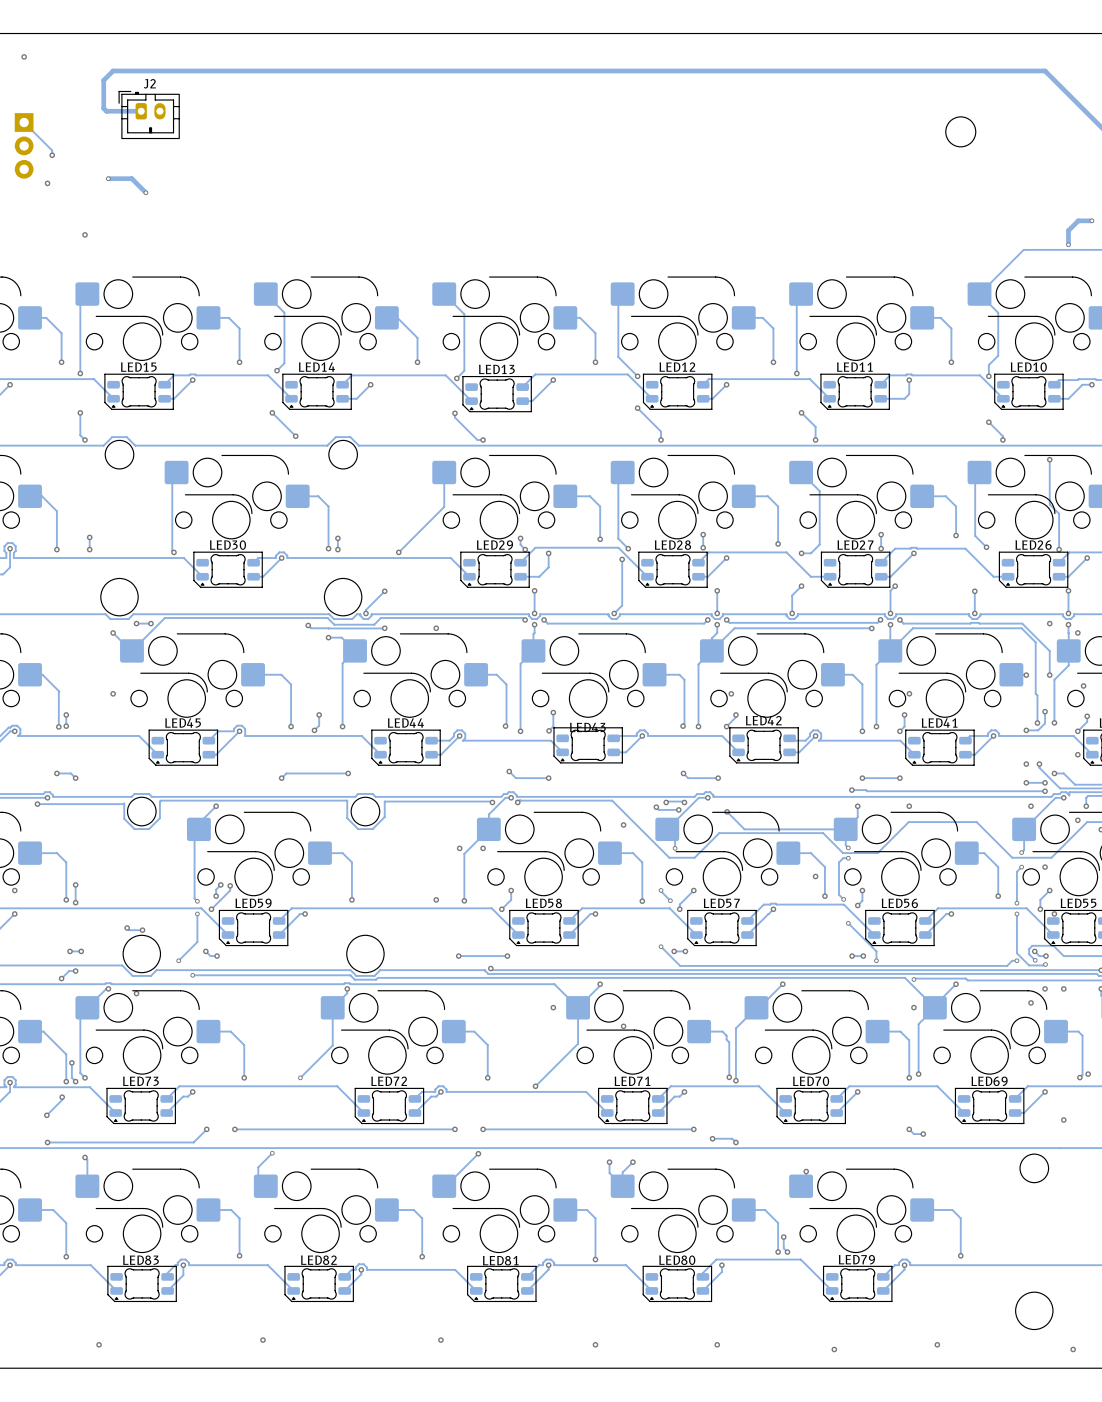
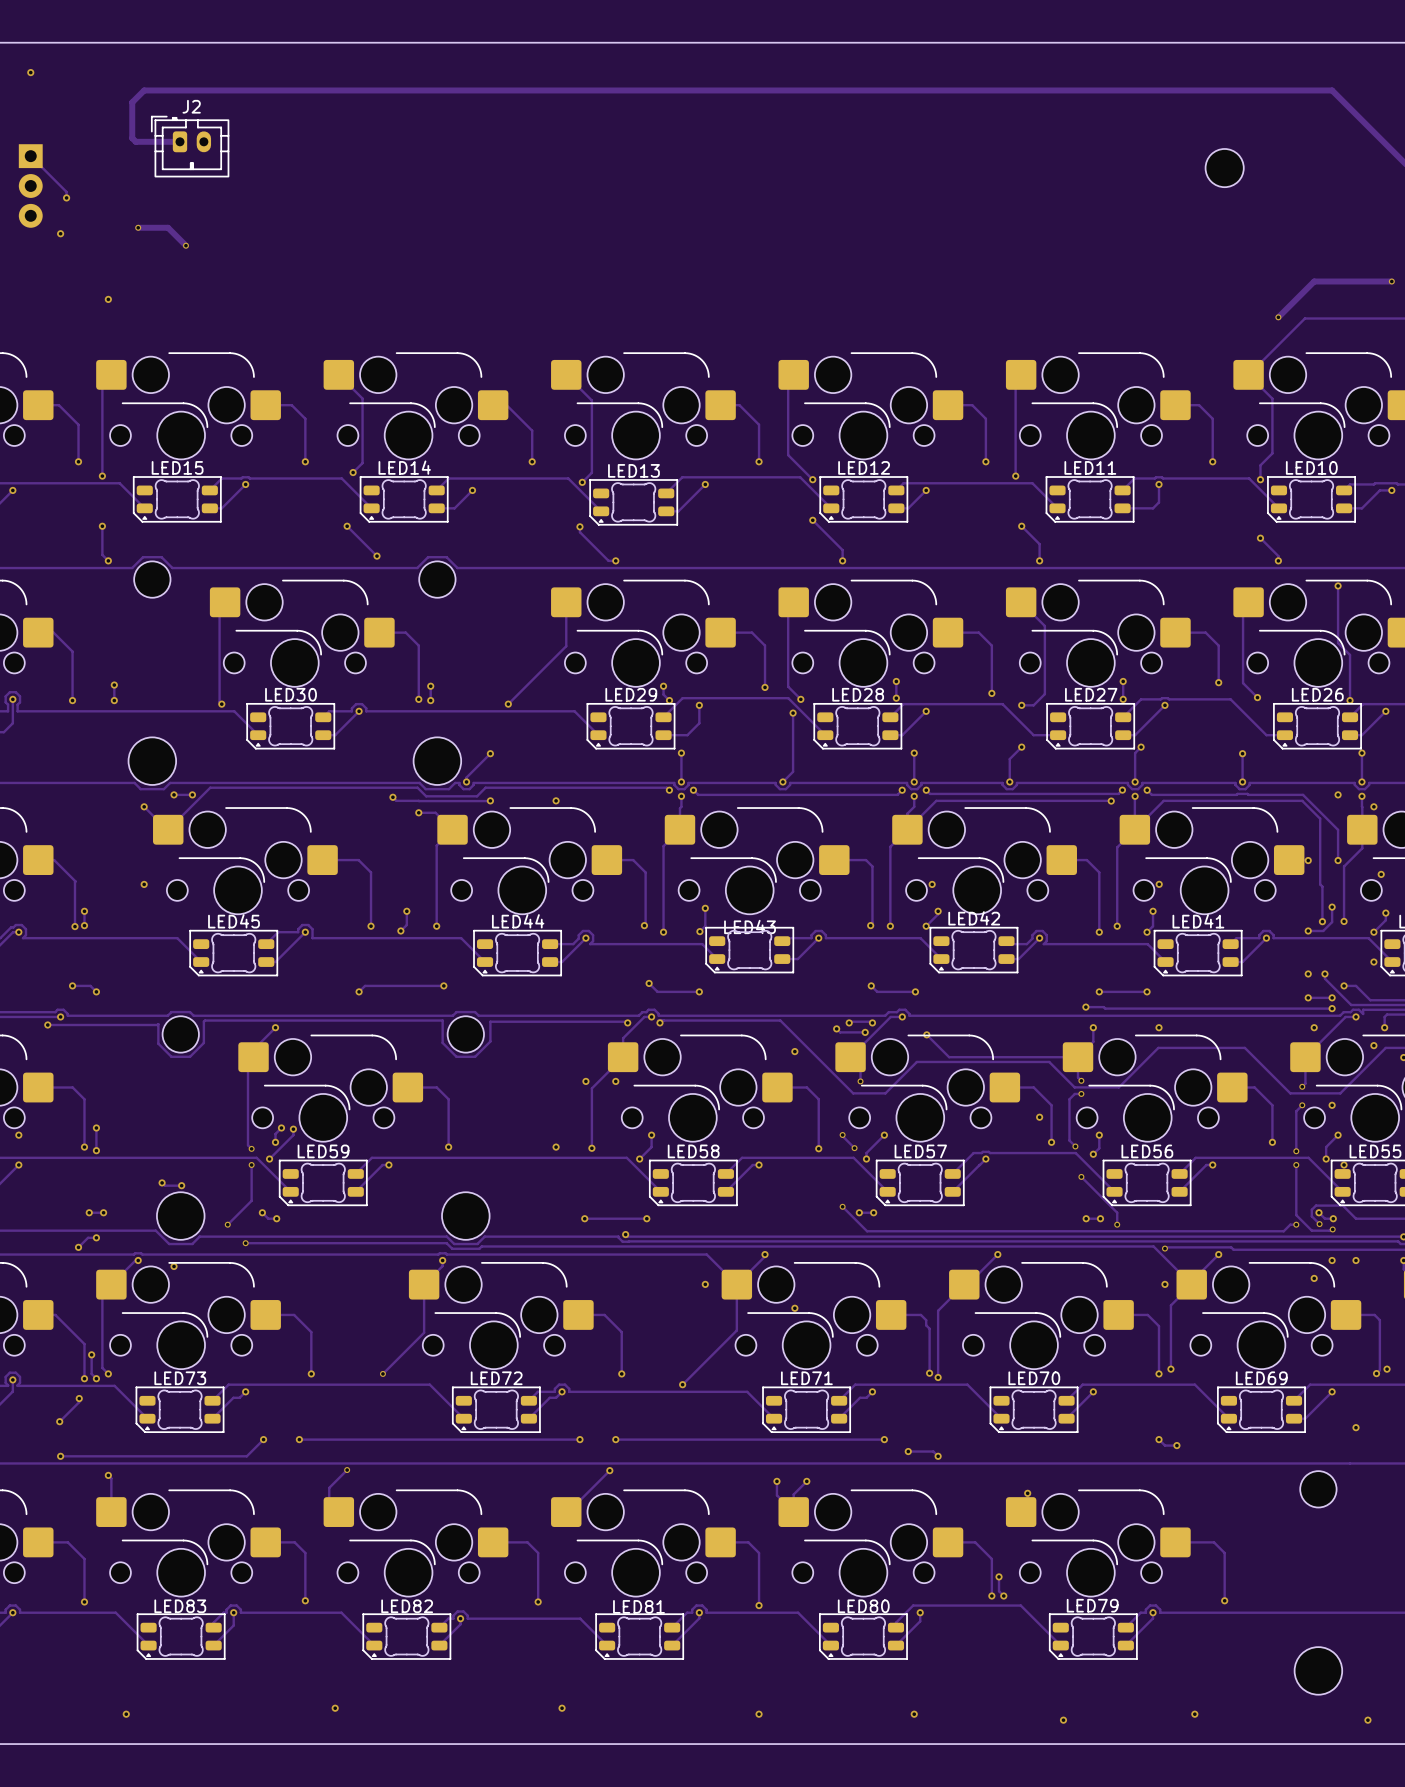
track: (1078, 220) (1068, 230) (1068, 244) -> (1374, 281) (1314, 281) (1278, 317)
via: (1068, 244) -> none
via: none -> (1278, 317)

